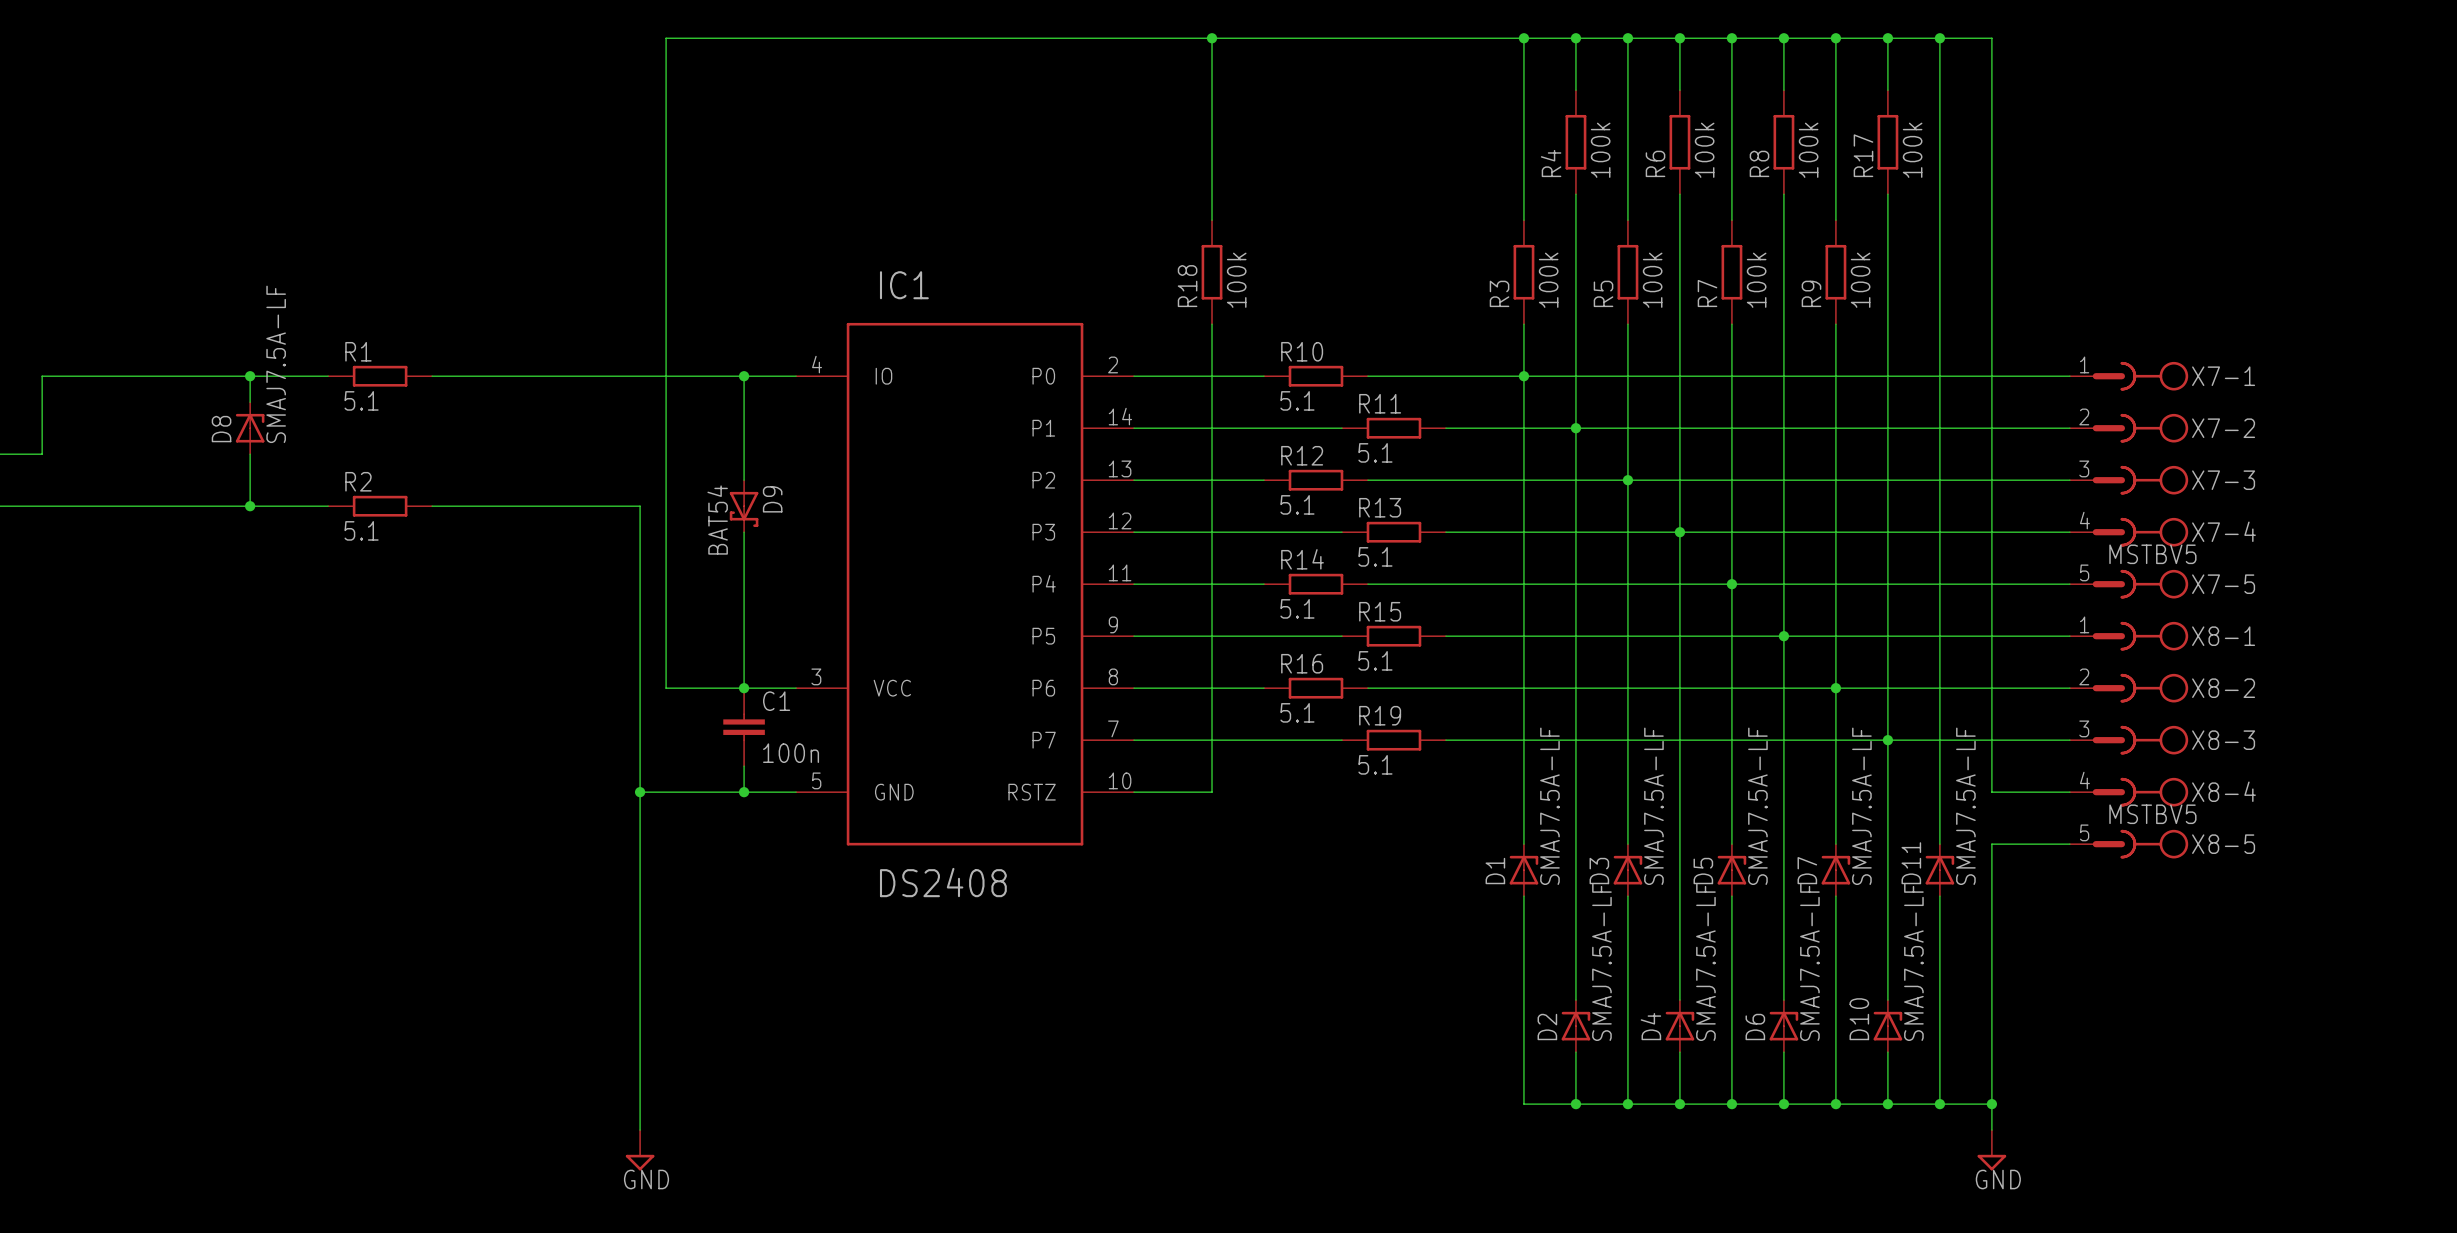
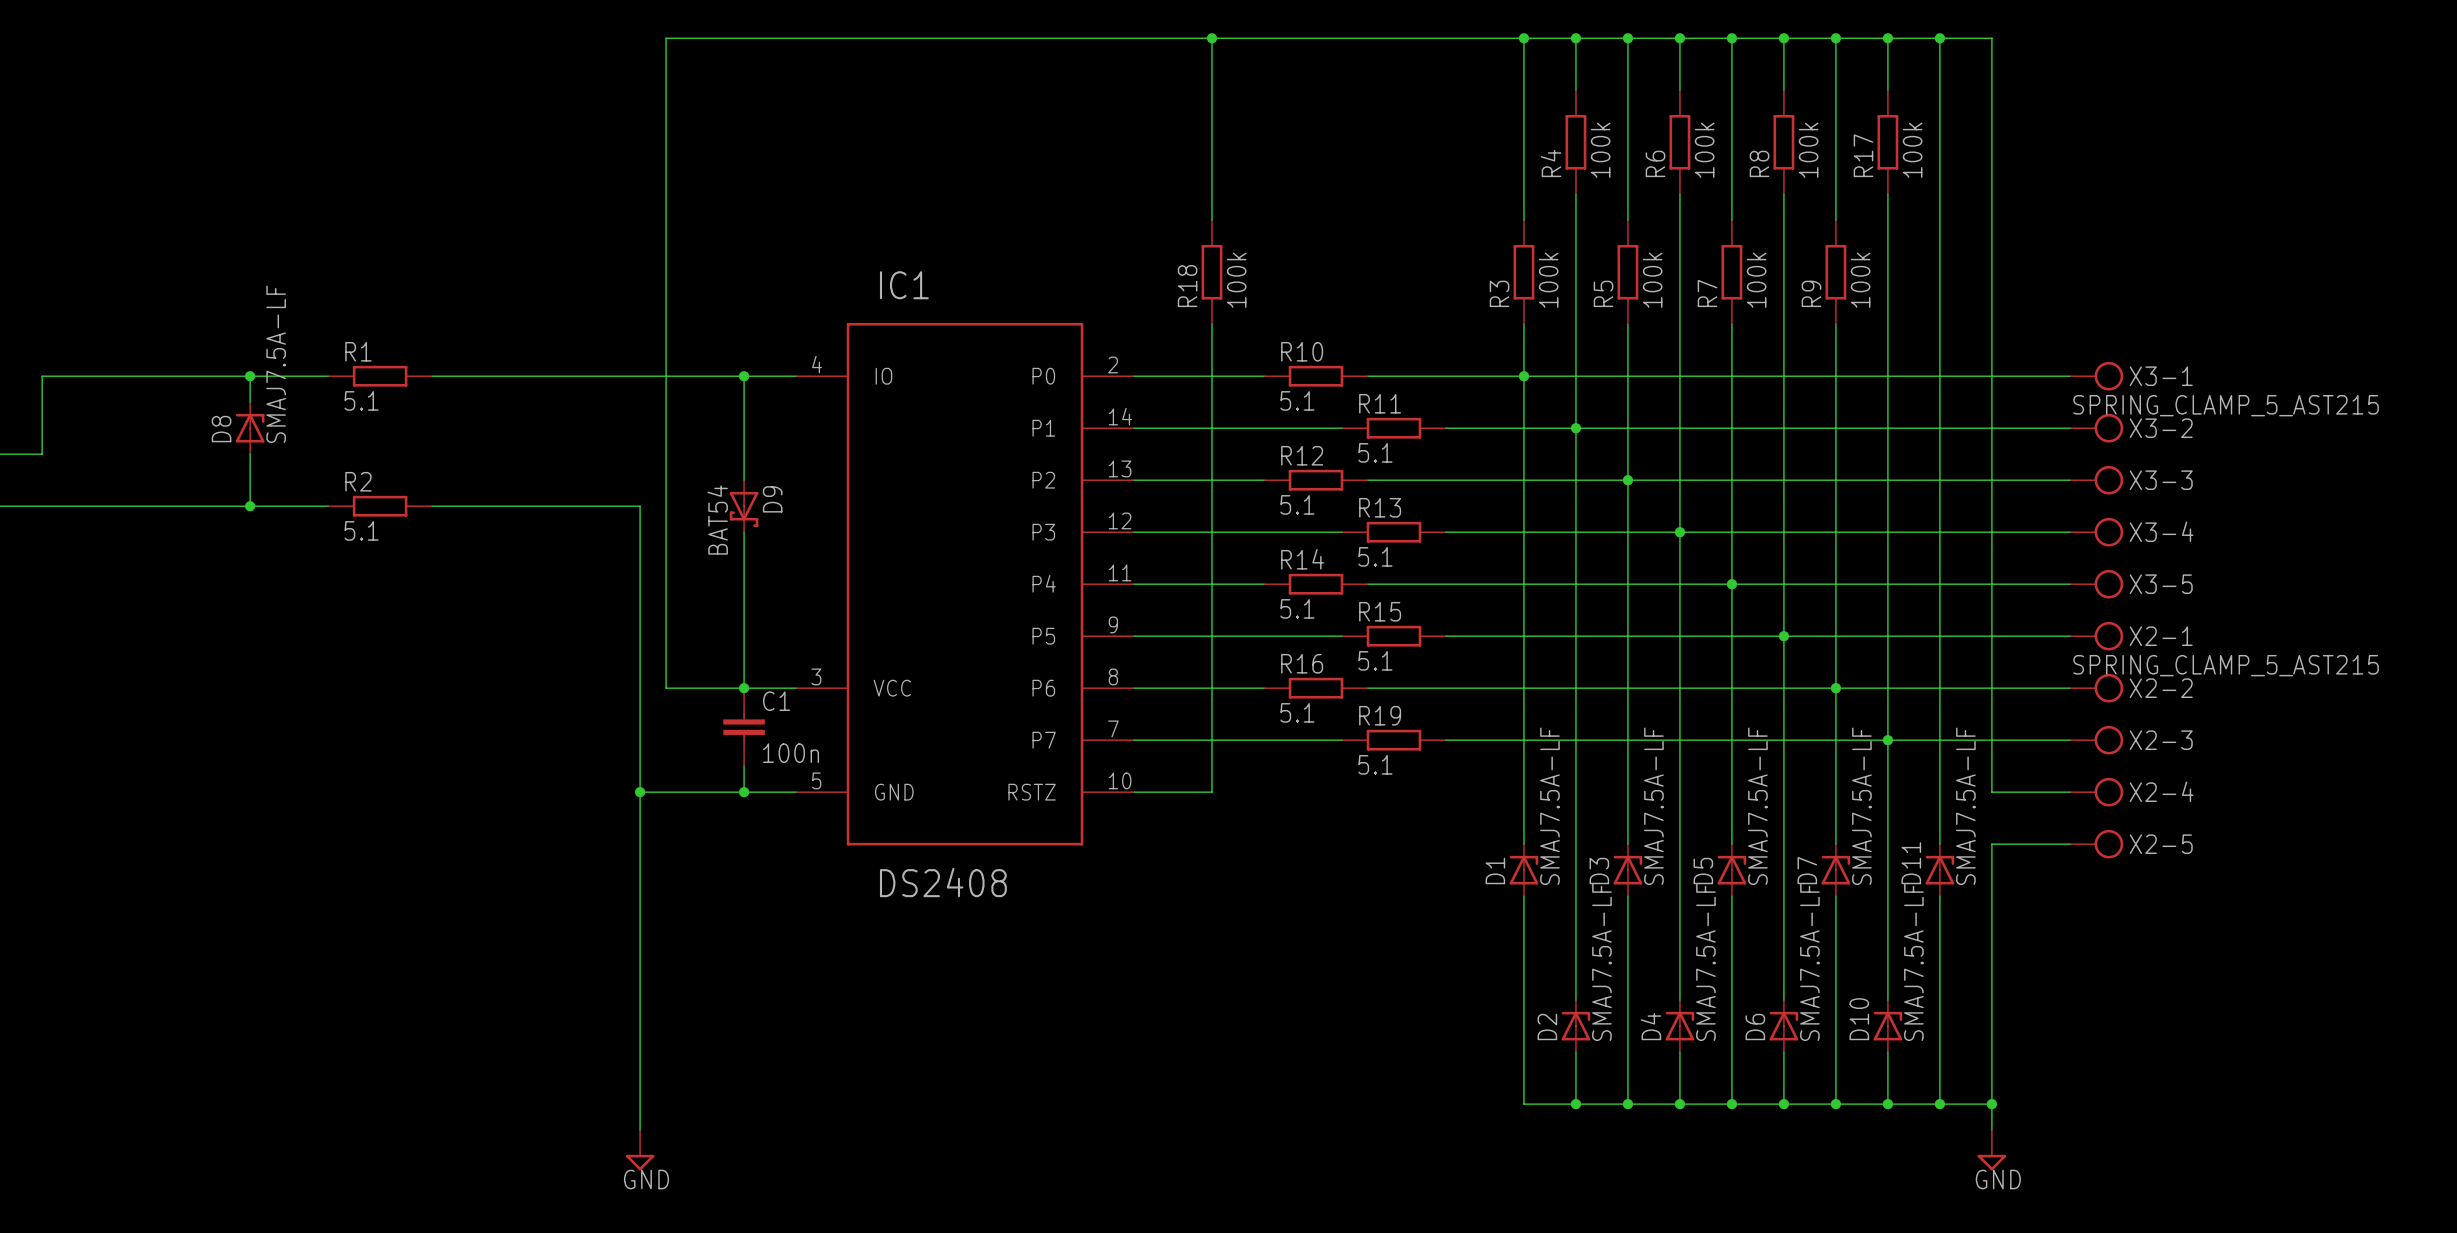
X3-1: none -> SPRING_CLAMP_5_AST215 (2096, 376)
X7-1: (2129, 376) -> none
X3-2: none -> (2096, 428)
X7-2: (2129, 428) -> none
X3-3: none -> (2096, 480)
X7-3: (2129, 480) -> none
X3-4: none -> (2096, 532)
X7-4: (2129, 532) -> none
X3-5: none -> (2096, 584)
X7-5: MSTBV5 (2129, 584) -> none
X2-1: none -> SPRING_CLAMP_5_AST215 (2096, 636)
X8-1: (2129, 636) -> none
X2-2: none -> (2096, 688)
X8-2: (2129, 688) -> none
X2-3: none -> (2096, 740)
X8-3: (2129, 740) -> none
X2-4: none -> (2096, 792)
X8-4: (2129, 792) -> none
X2-5: none -> (2096, 844)
X8-5: MSTBV5 (2129, 844) -> none

